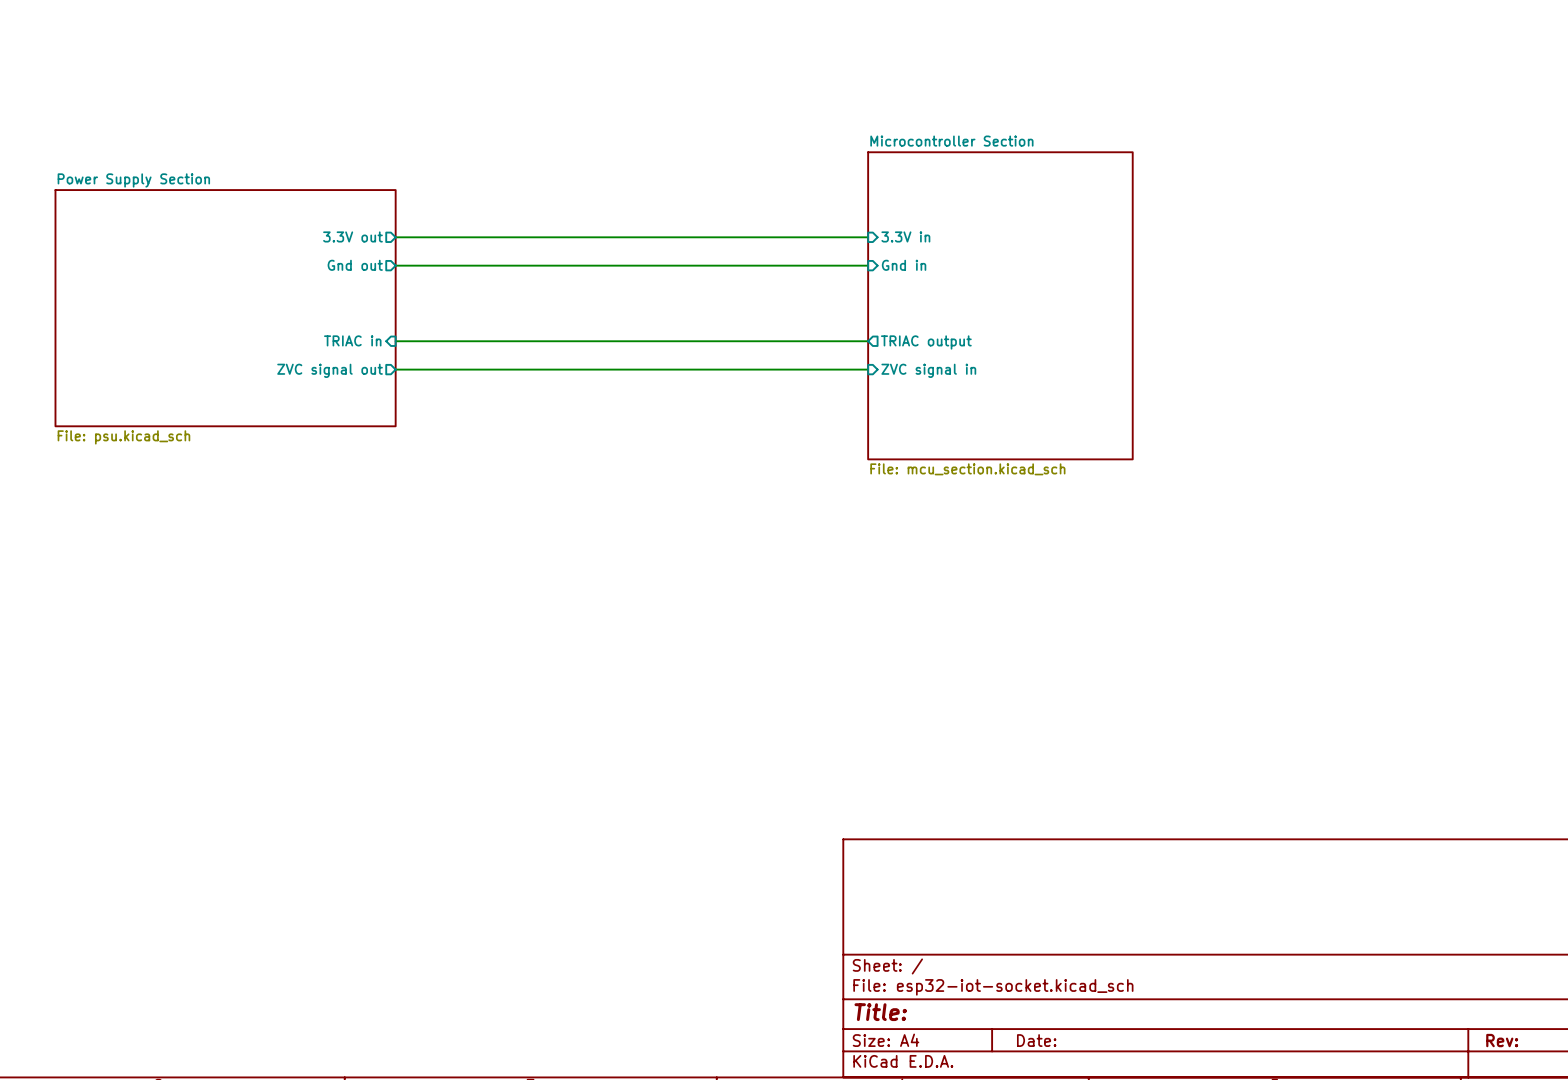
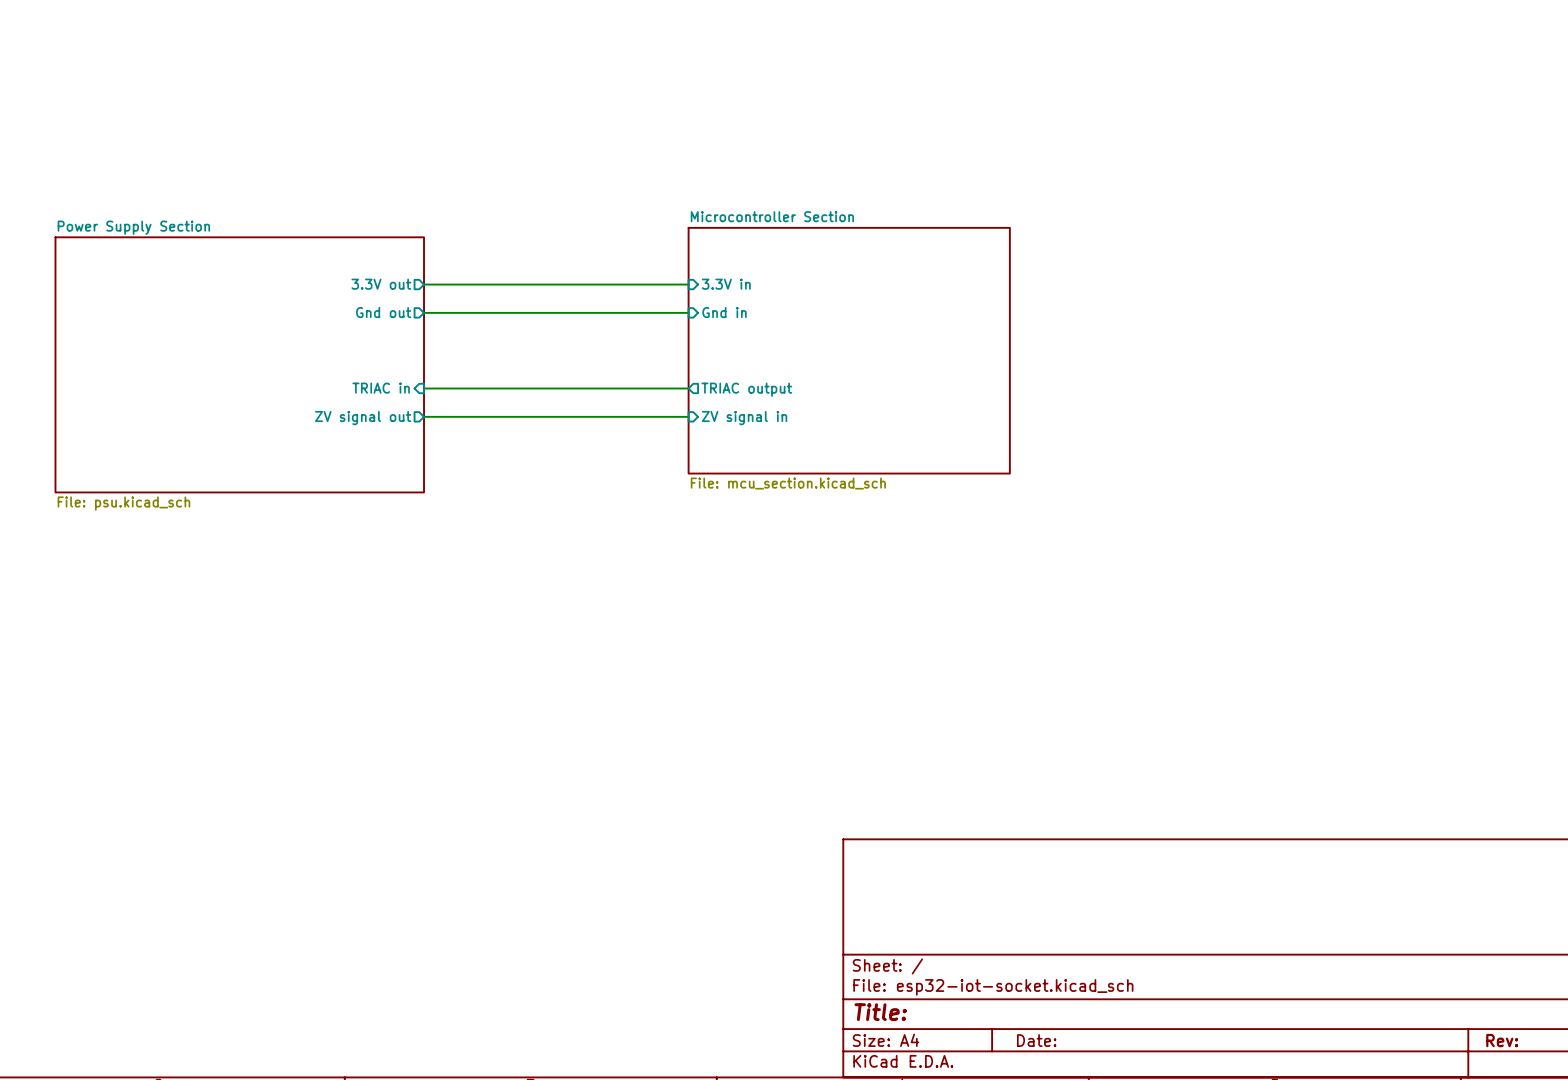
sheet pin position: 3.3V out (352, 236) -> 3.3V out (381, 284)
sheet pin position: 3.3V in (905, 236) -> 3.3V in (726, 284)
wire: (395, 237) (868, 237) -> none
sheet pin position: Gnd out (355, 265) -> Gnd out (383, 312)
wire: (395, 265) (868, 265) -> none
sheet pin position: Gnd in (904, 265) -> Gnd in (724, 312)
wire: none -> (424, 284) (688, 284)
sheet Microcontroller Section: File: mcu_section.kicad_sch (1000, 305) -> none
sheet Power Supply Section: File: psu.kicad_sch (225, 308) -> none
wire: none -> (424, 312) (688, 312)
sheet pin position: TRIAC in (352, 340) -> TRIAC in (381, 388)
wire: (395, 341) (868, 341) -> none
sheet pin position: TRIAC output (926, 342) -> TRIAC output (746, 389)
sheet Microcontroller Section: none -> File: mcu_section.kicad_sch (849, 350)
sheet Power Supply Section: none -> File: psu.kicad_sch (239, 364)
wire: (395, 369) (868, 369) -> none
sheet pin: ZVC signal out (330, 370) -> none
sheet pin: ZVC signal in (928, 370) -> none
wire: none -> (424, 388) (688, 388)
wire: none -> (424, 416) (688, 416)
sheet pin: none -> ZV signal out (363, 418)
sheet pin: none -> ZV signal in (744, 418)

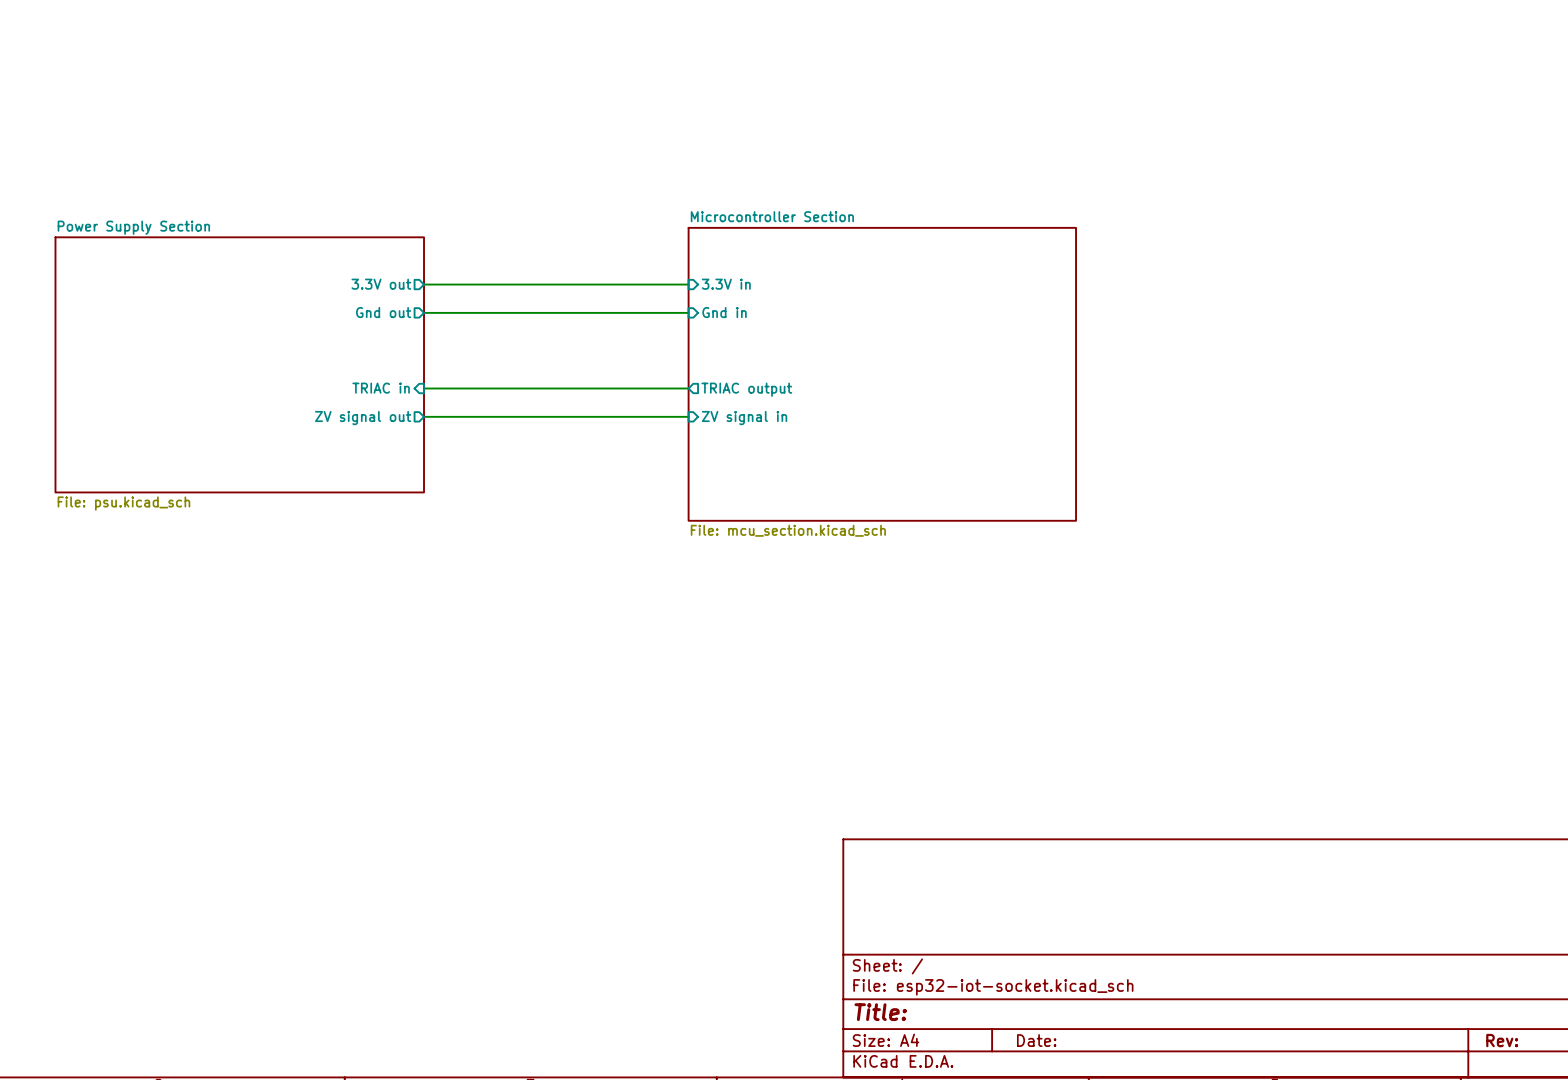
sheet Microcontroller Section: File: mcu_section.kicad_sch (849, 350) -> none
sheet Microcontroller Section: none -> File: mcu_section.kicad_sch (882, 374)

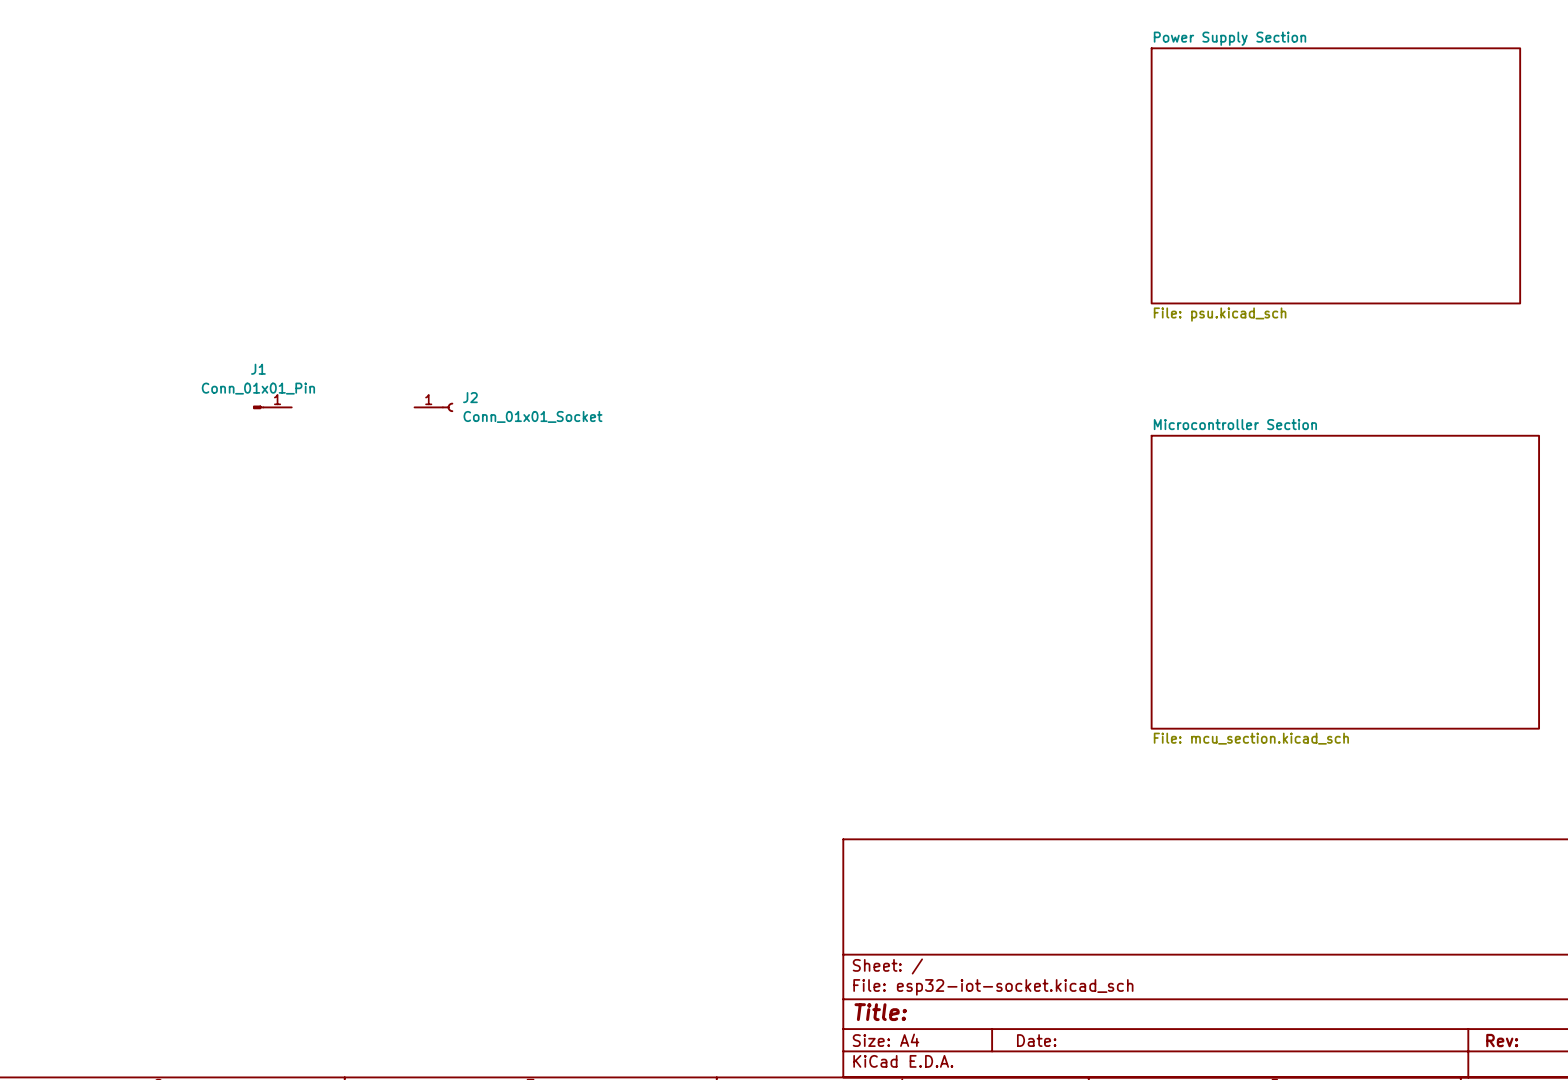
sheet Power Supply Section: none -> File: psu.kicad_sch (1335, 175)
sheet pin: 3.3V out (381, 284) -> none
wire: (424, 284) (688, 284) -> none
sheet pin: 3.3V in (726, 284) -> none
sheet pin: Gnd out (383, 312) -> none
wire: (424, 312) (688, 312) -> none
sheet pin: Gnd in (724, 312) -> none
sheet Power Supply Section: File: psu.kicad_sch (239, 364) -> none
sheet Microcontroller Section: File: mcu_section.kicad_sch (882, 374) -> none
sheet pin: TRIAC in (381, 388) -> none
wire: (424, 388) (688, 388) -> none
sheet pin: TRIAC output (746, 389) -> none
J1: none -> Conn_01x01_Pin (272, 407)
J2: none -> Conn_01x01_Socket (433, 407)
wire: (424, 416) (688, 416) -> none
sheet pin: ZV signal out (363, 418) -> none
sheet pin: ZV signal in (744, 418) -> none
sheet Microcontroller Section: none -> File: mcu_section.kicad_sch (1345, 582)

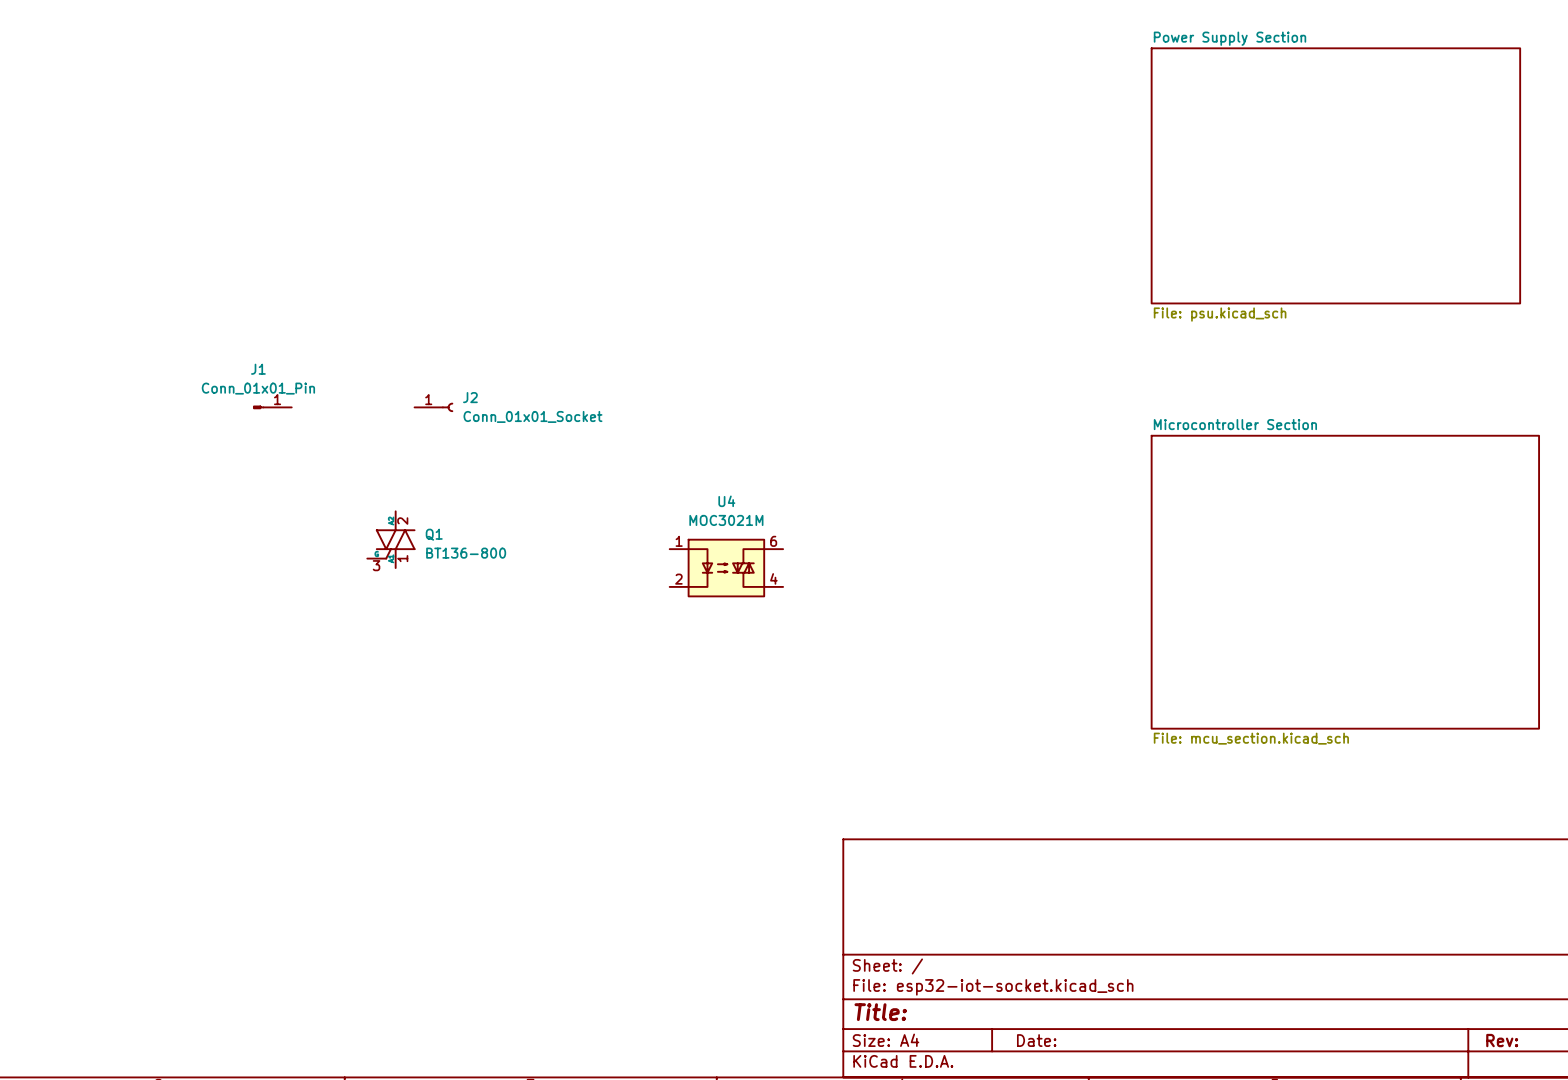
Q1: none -> BT136-800 (391, 539)
U4: none -> MOC3021M (726, 568)

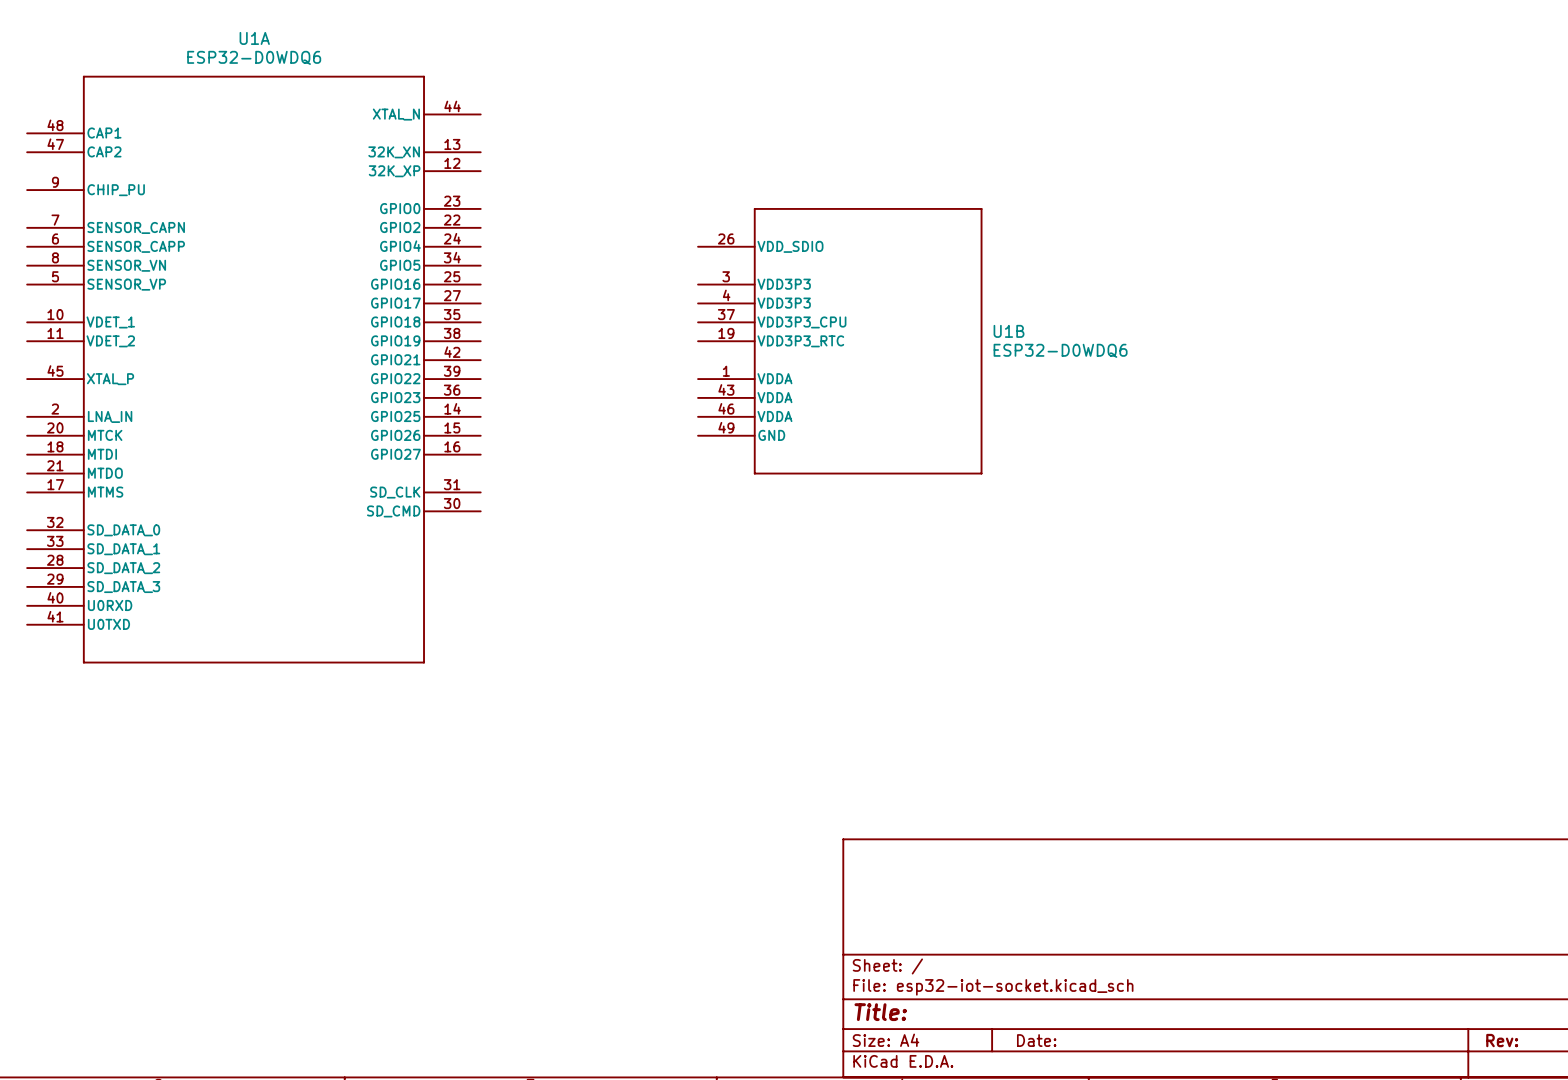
sheet Power Supply Section: File: psu.kicad_sch (1335, 175) -> none
U1B: none -> ESP32-D0WDQ6 (840, 341)
U1A: none -> ESP32-D0WDQ6 (253, 369)
J1: Conn_01x01_Pin (272, 407) -> none
J2: Conn_01x01_Socket (433, 407) -> none
Q1: BT136-800 (391, 539) -> none
U4: MOC3021M (726, 568) -> none
sheet Microcontroller Section: File: mcu_section.kicad_sch (1345, 582) -> none

